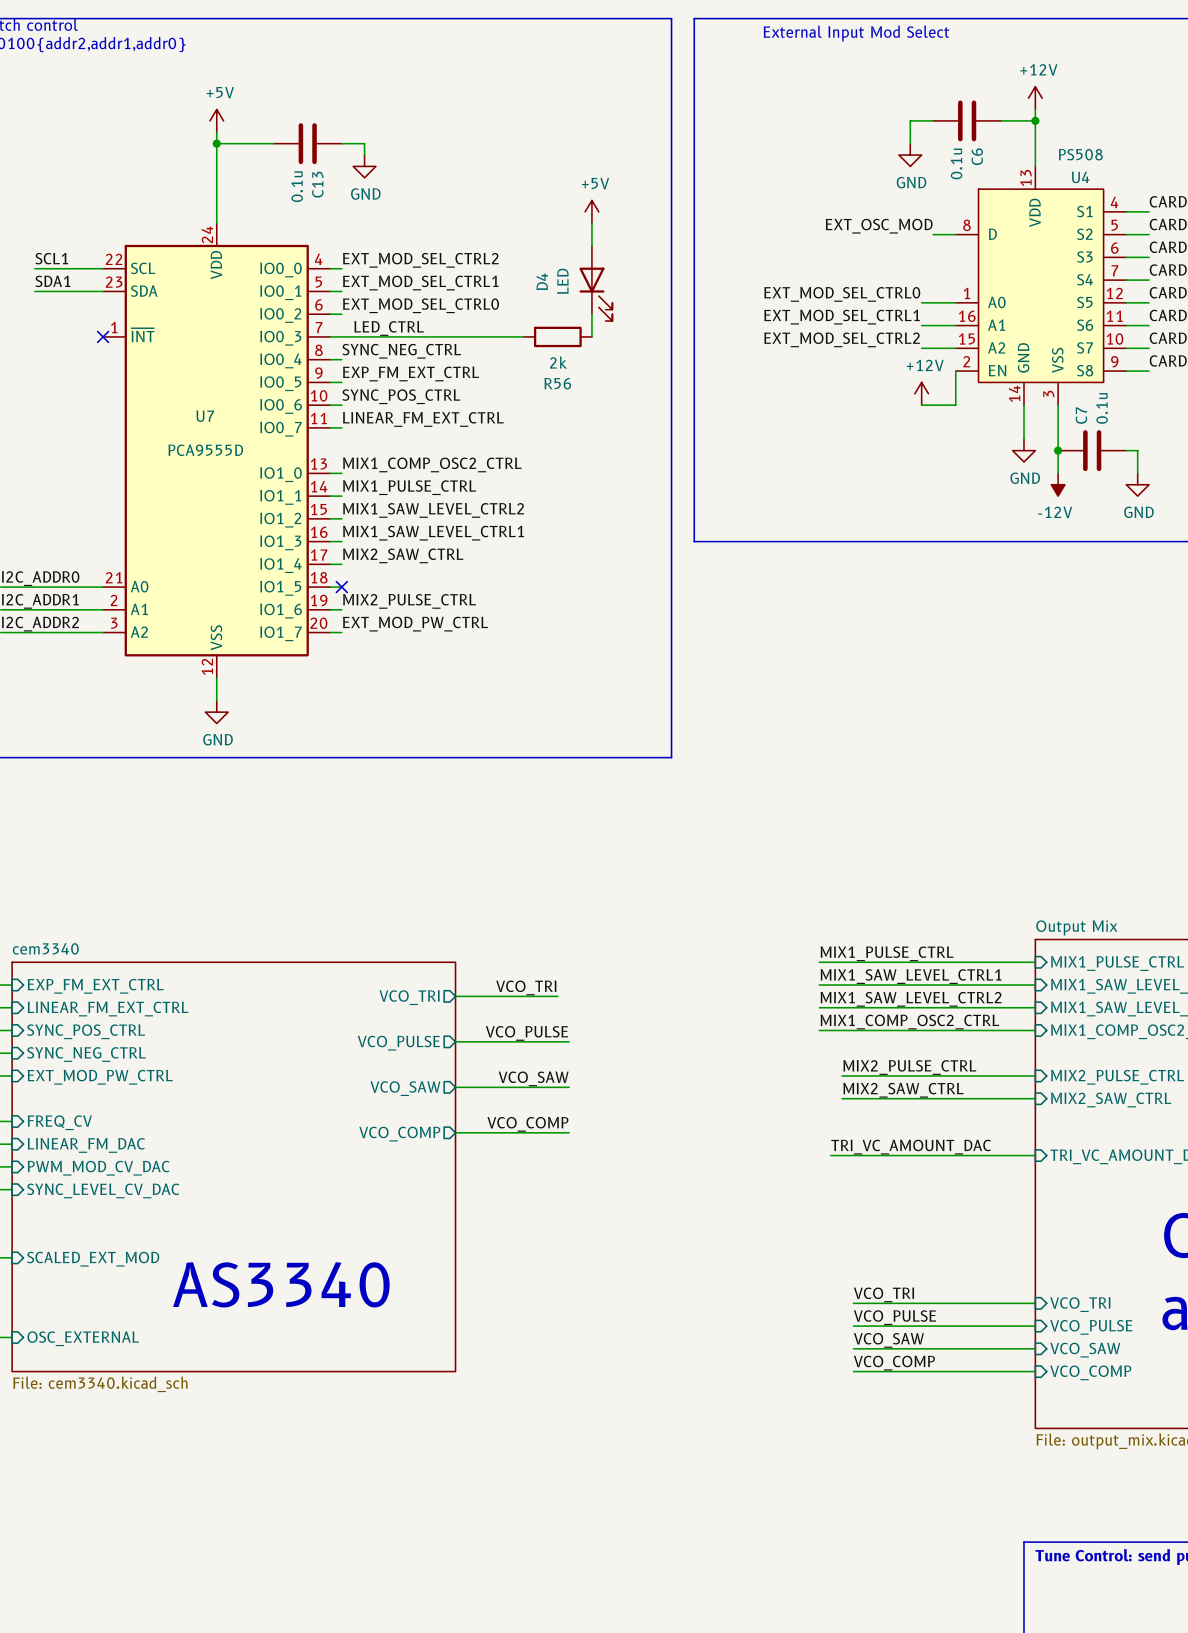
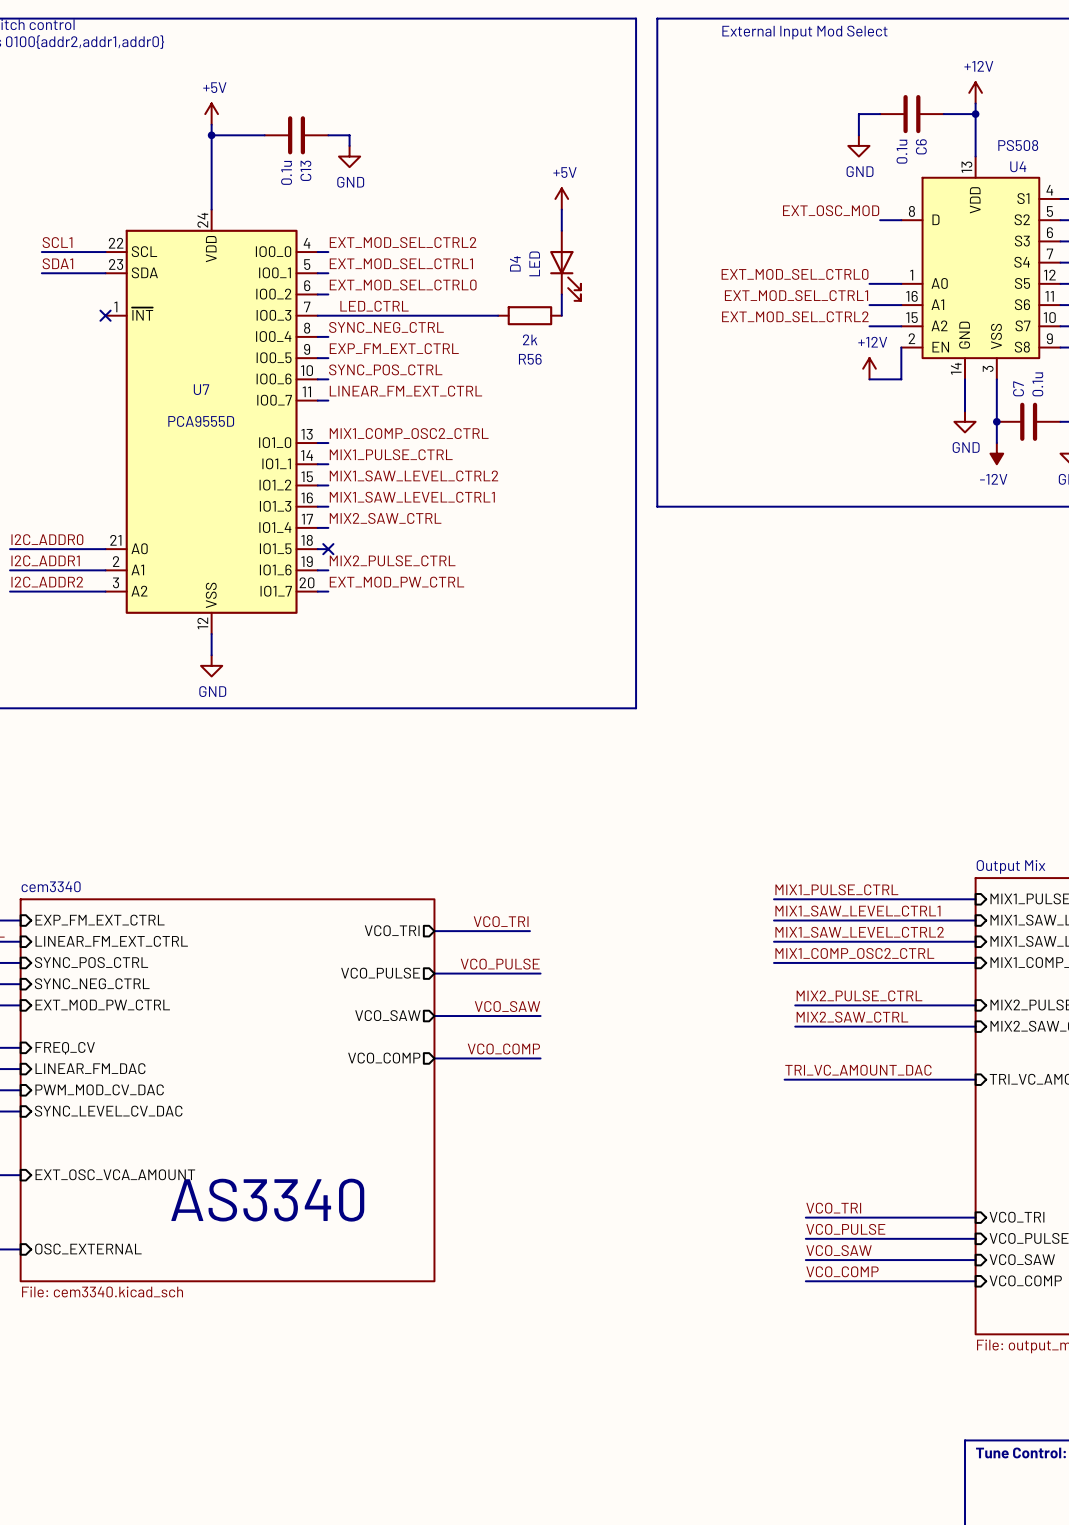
sheet pin: SCALED_EXT_MOD (93, 1259) -> EXT_OSC_VCA_AMOUNT (115, 1174)

